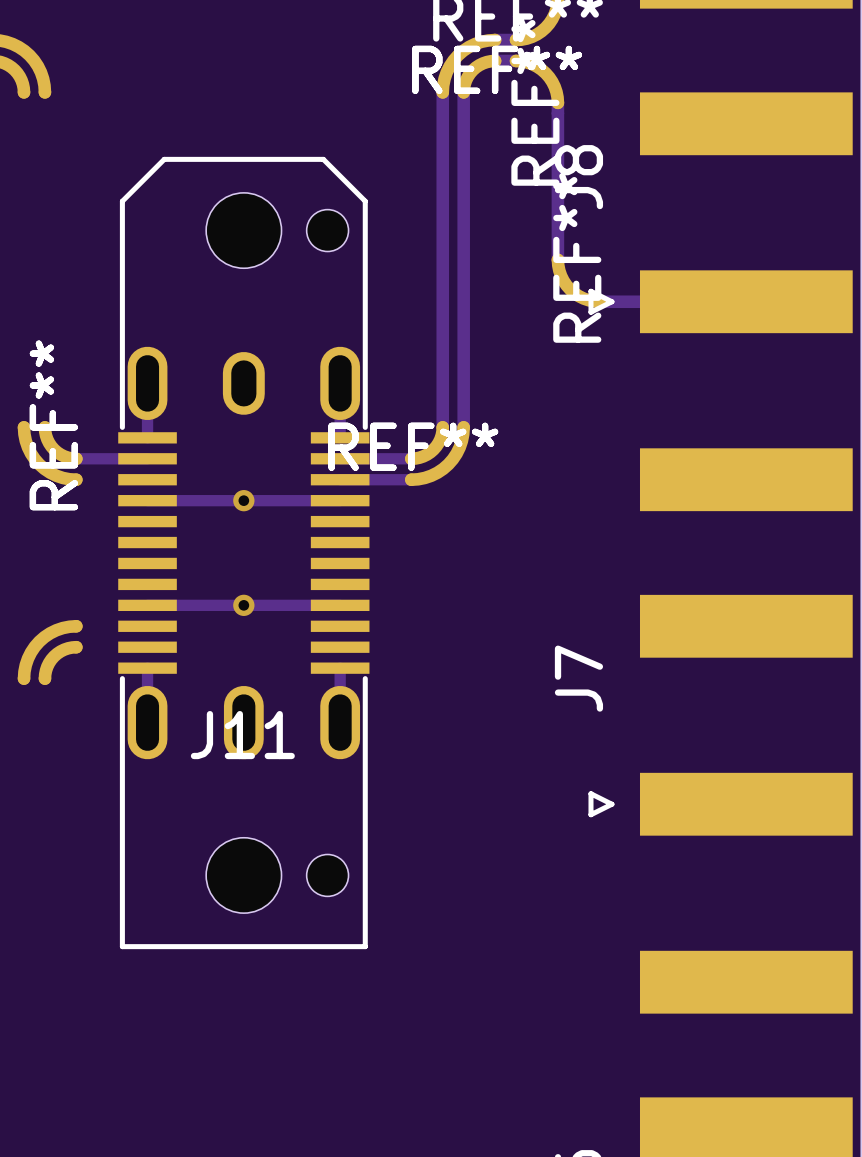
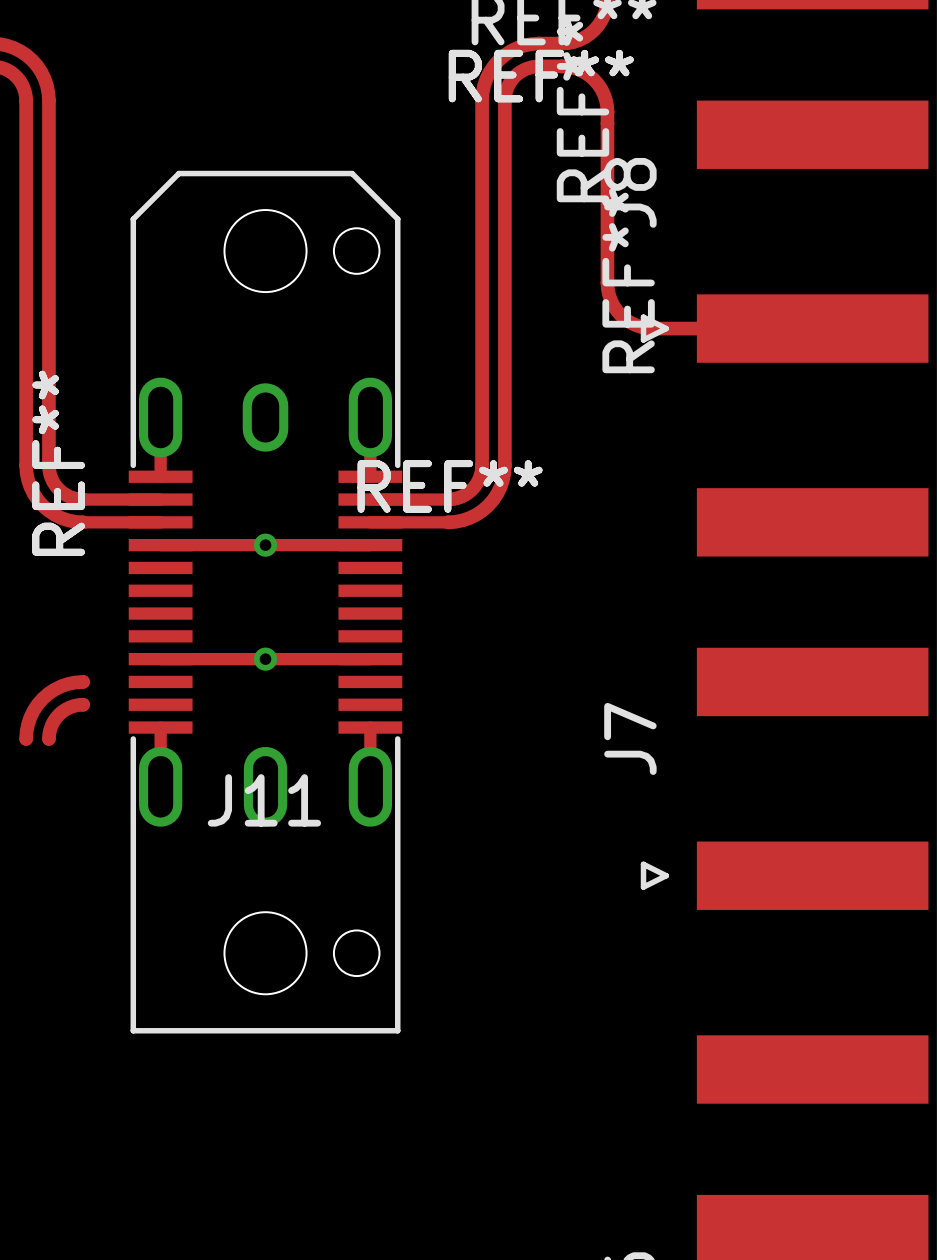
track: none -> (26, 100) (26, 465)
track: none -> (48, 100) (48, 465)
track: none -> (83, 522) (160, 522)

